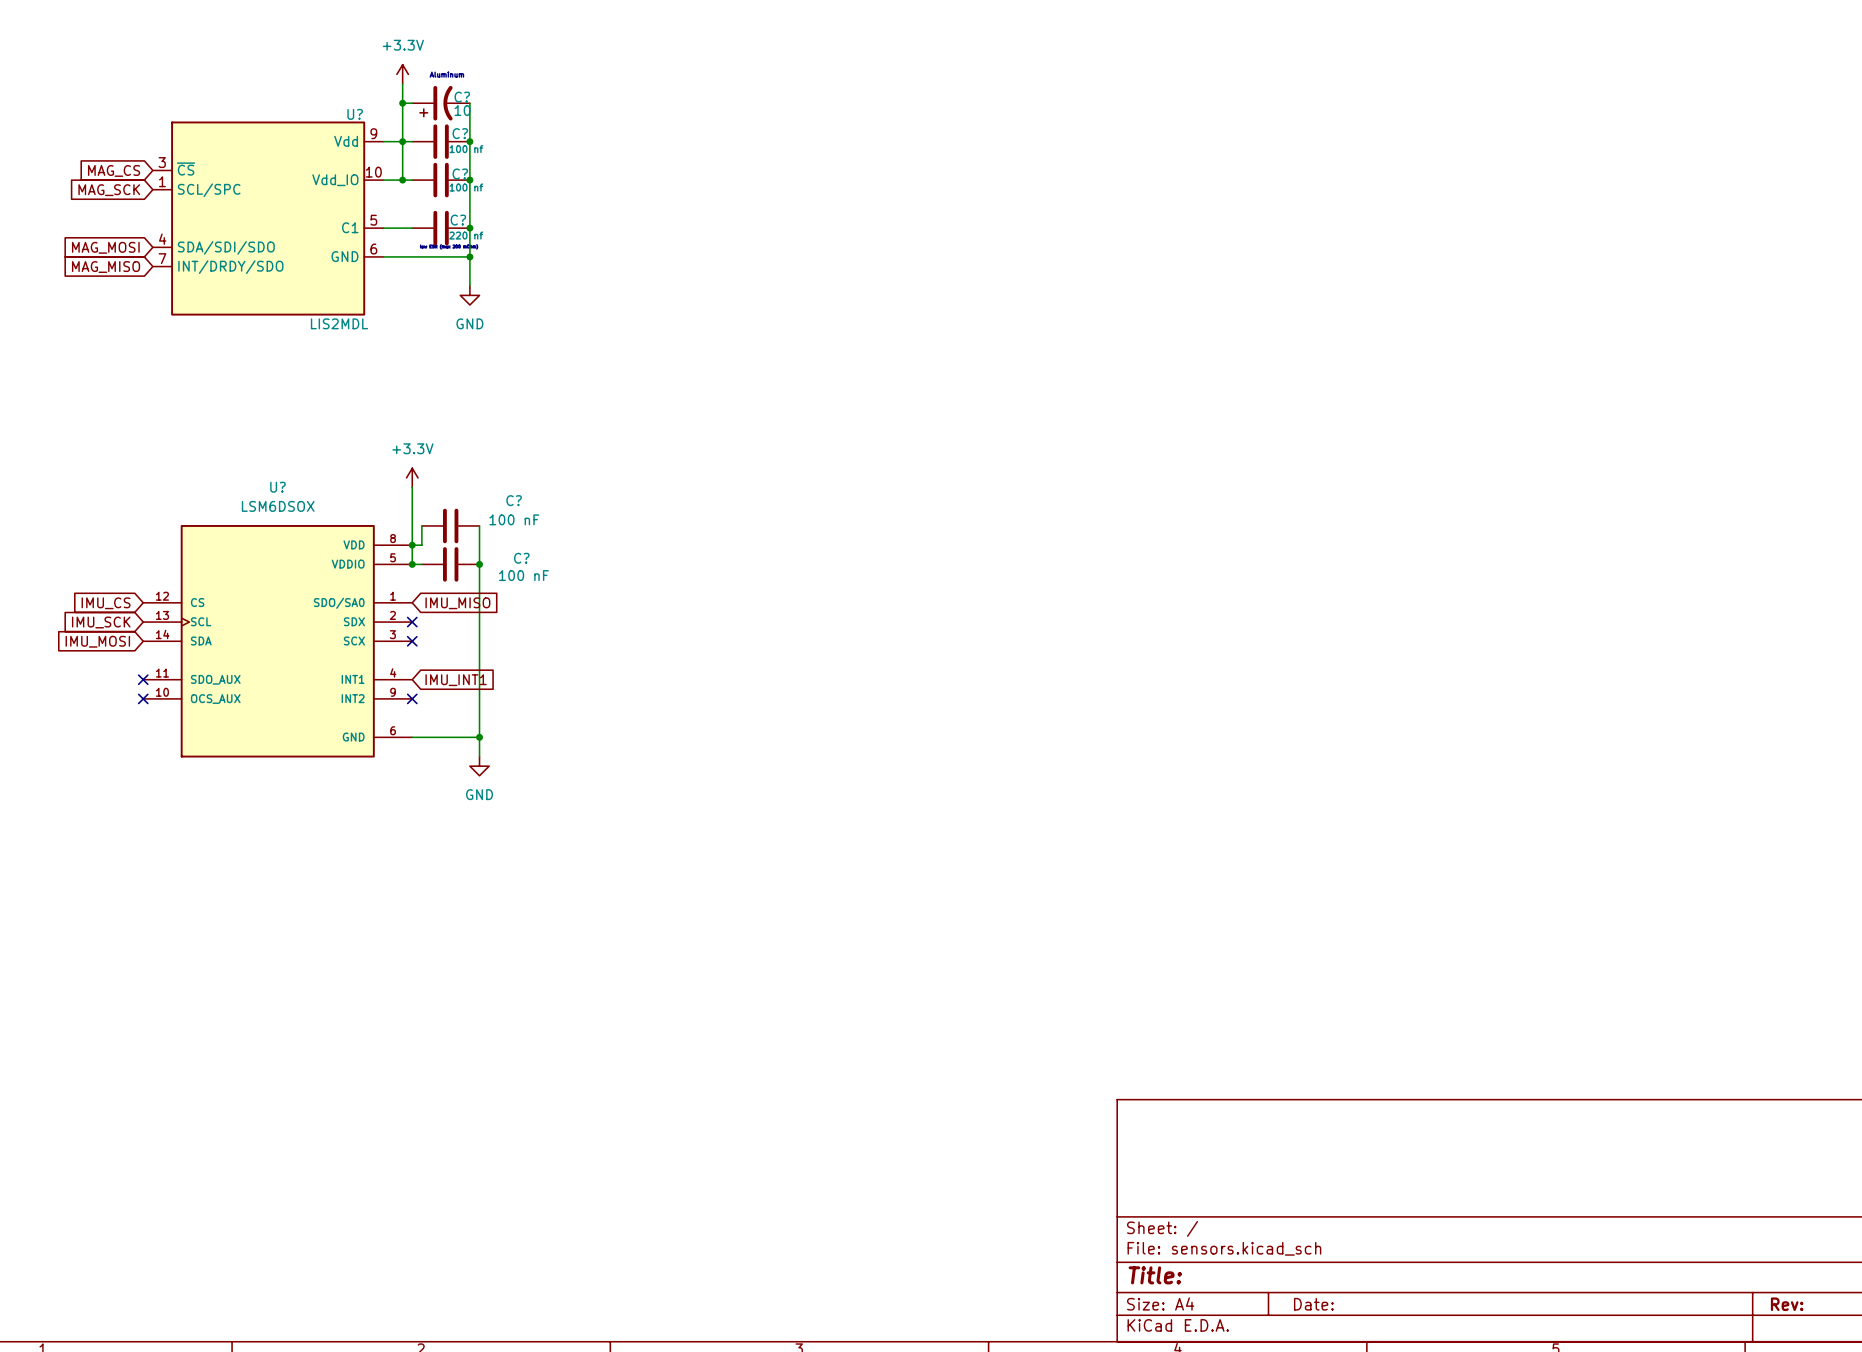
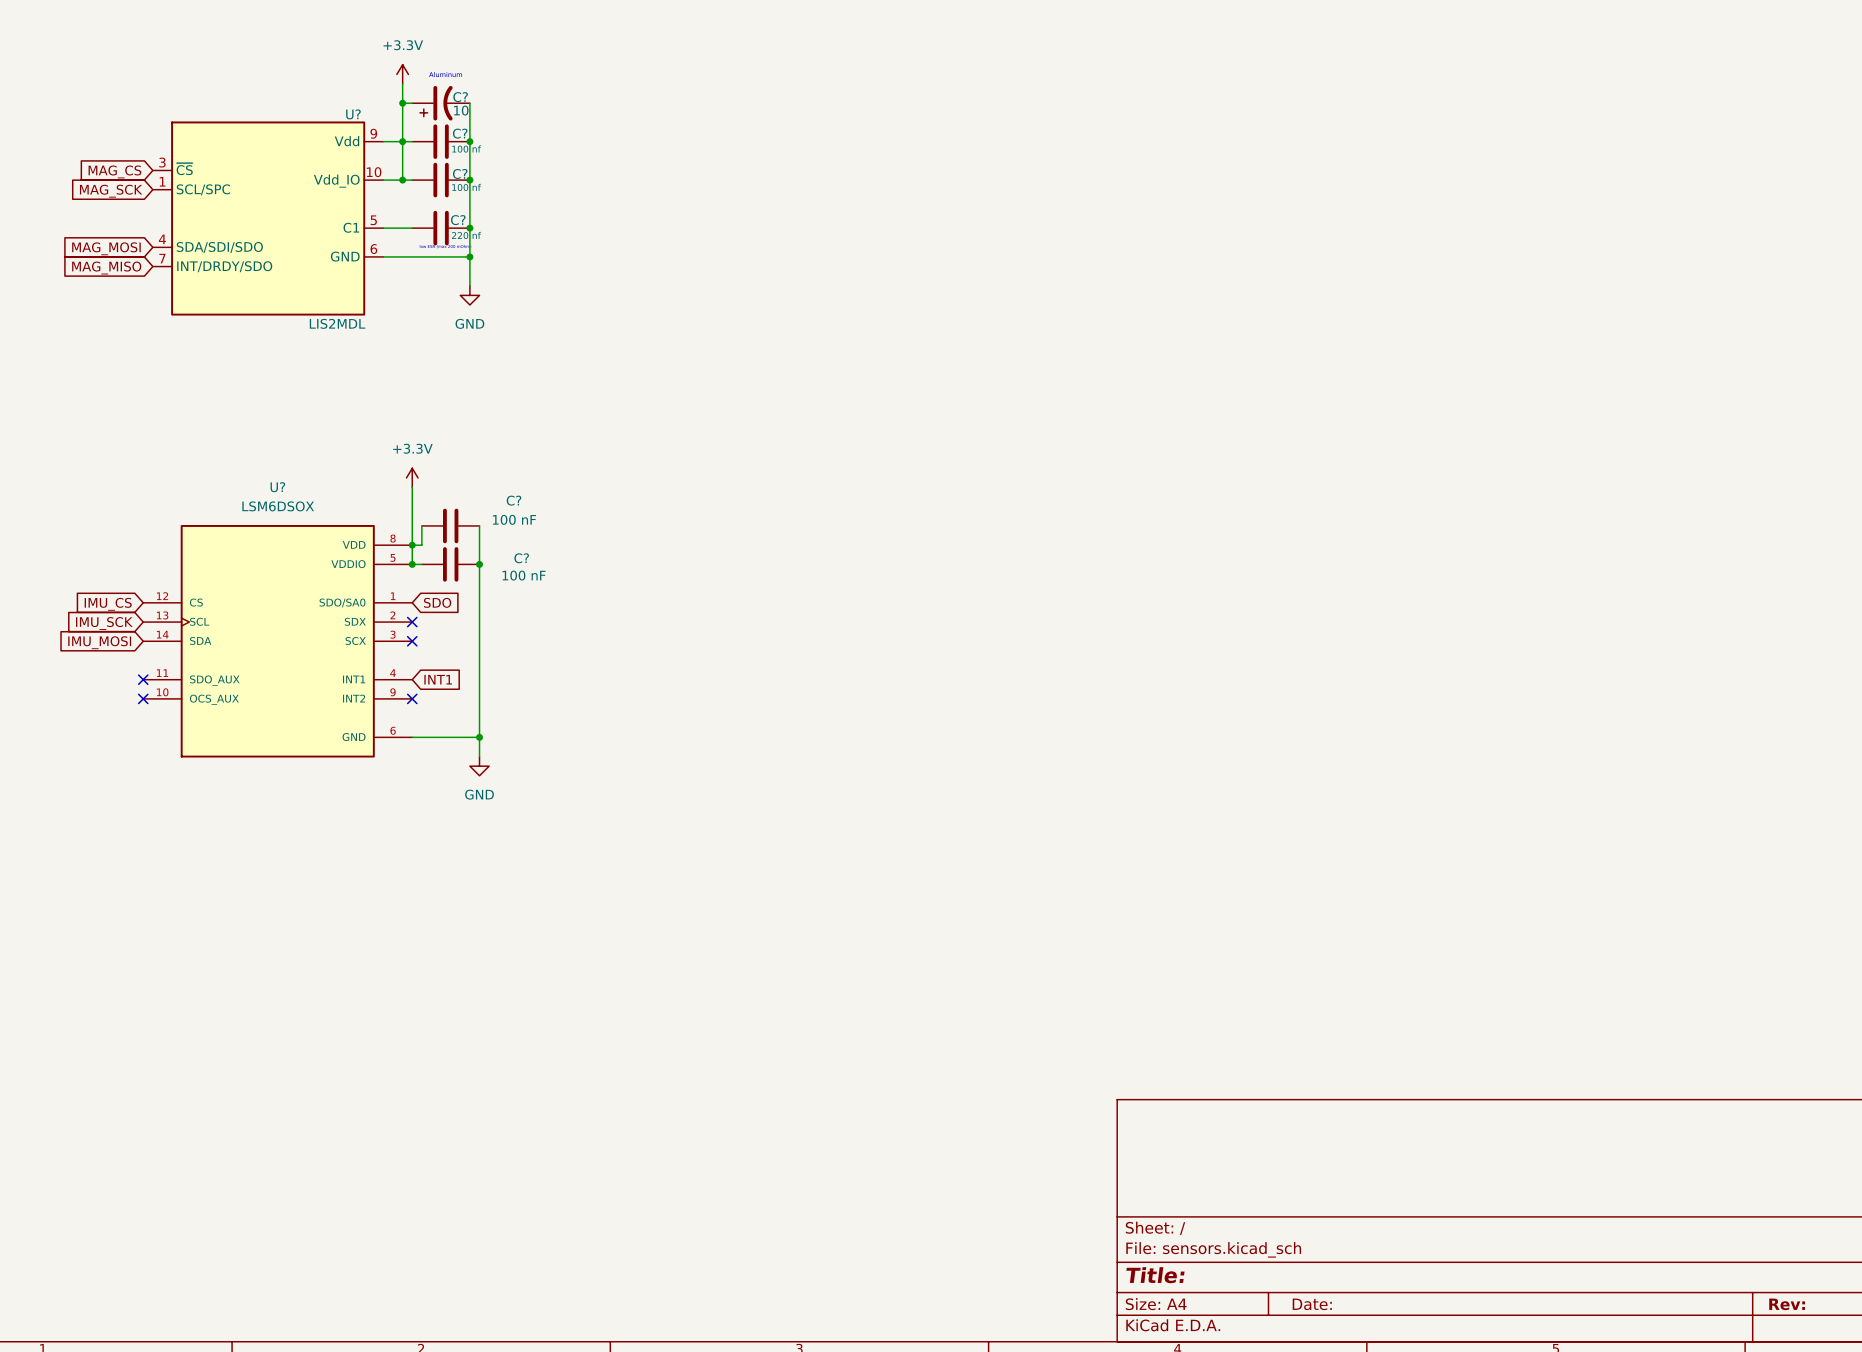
global label: IMU_MISO (457, 603) -> SDO (437, 602)
global label: IMU_INT1 (456, 680) -> INT1 (438, 679)

